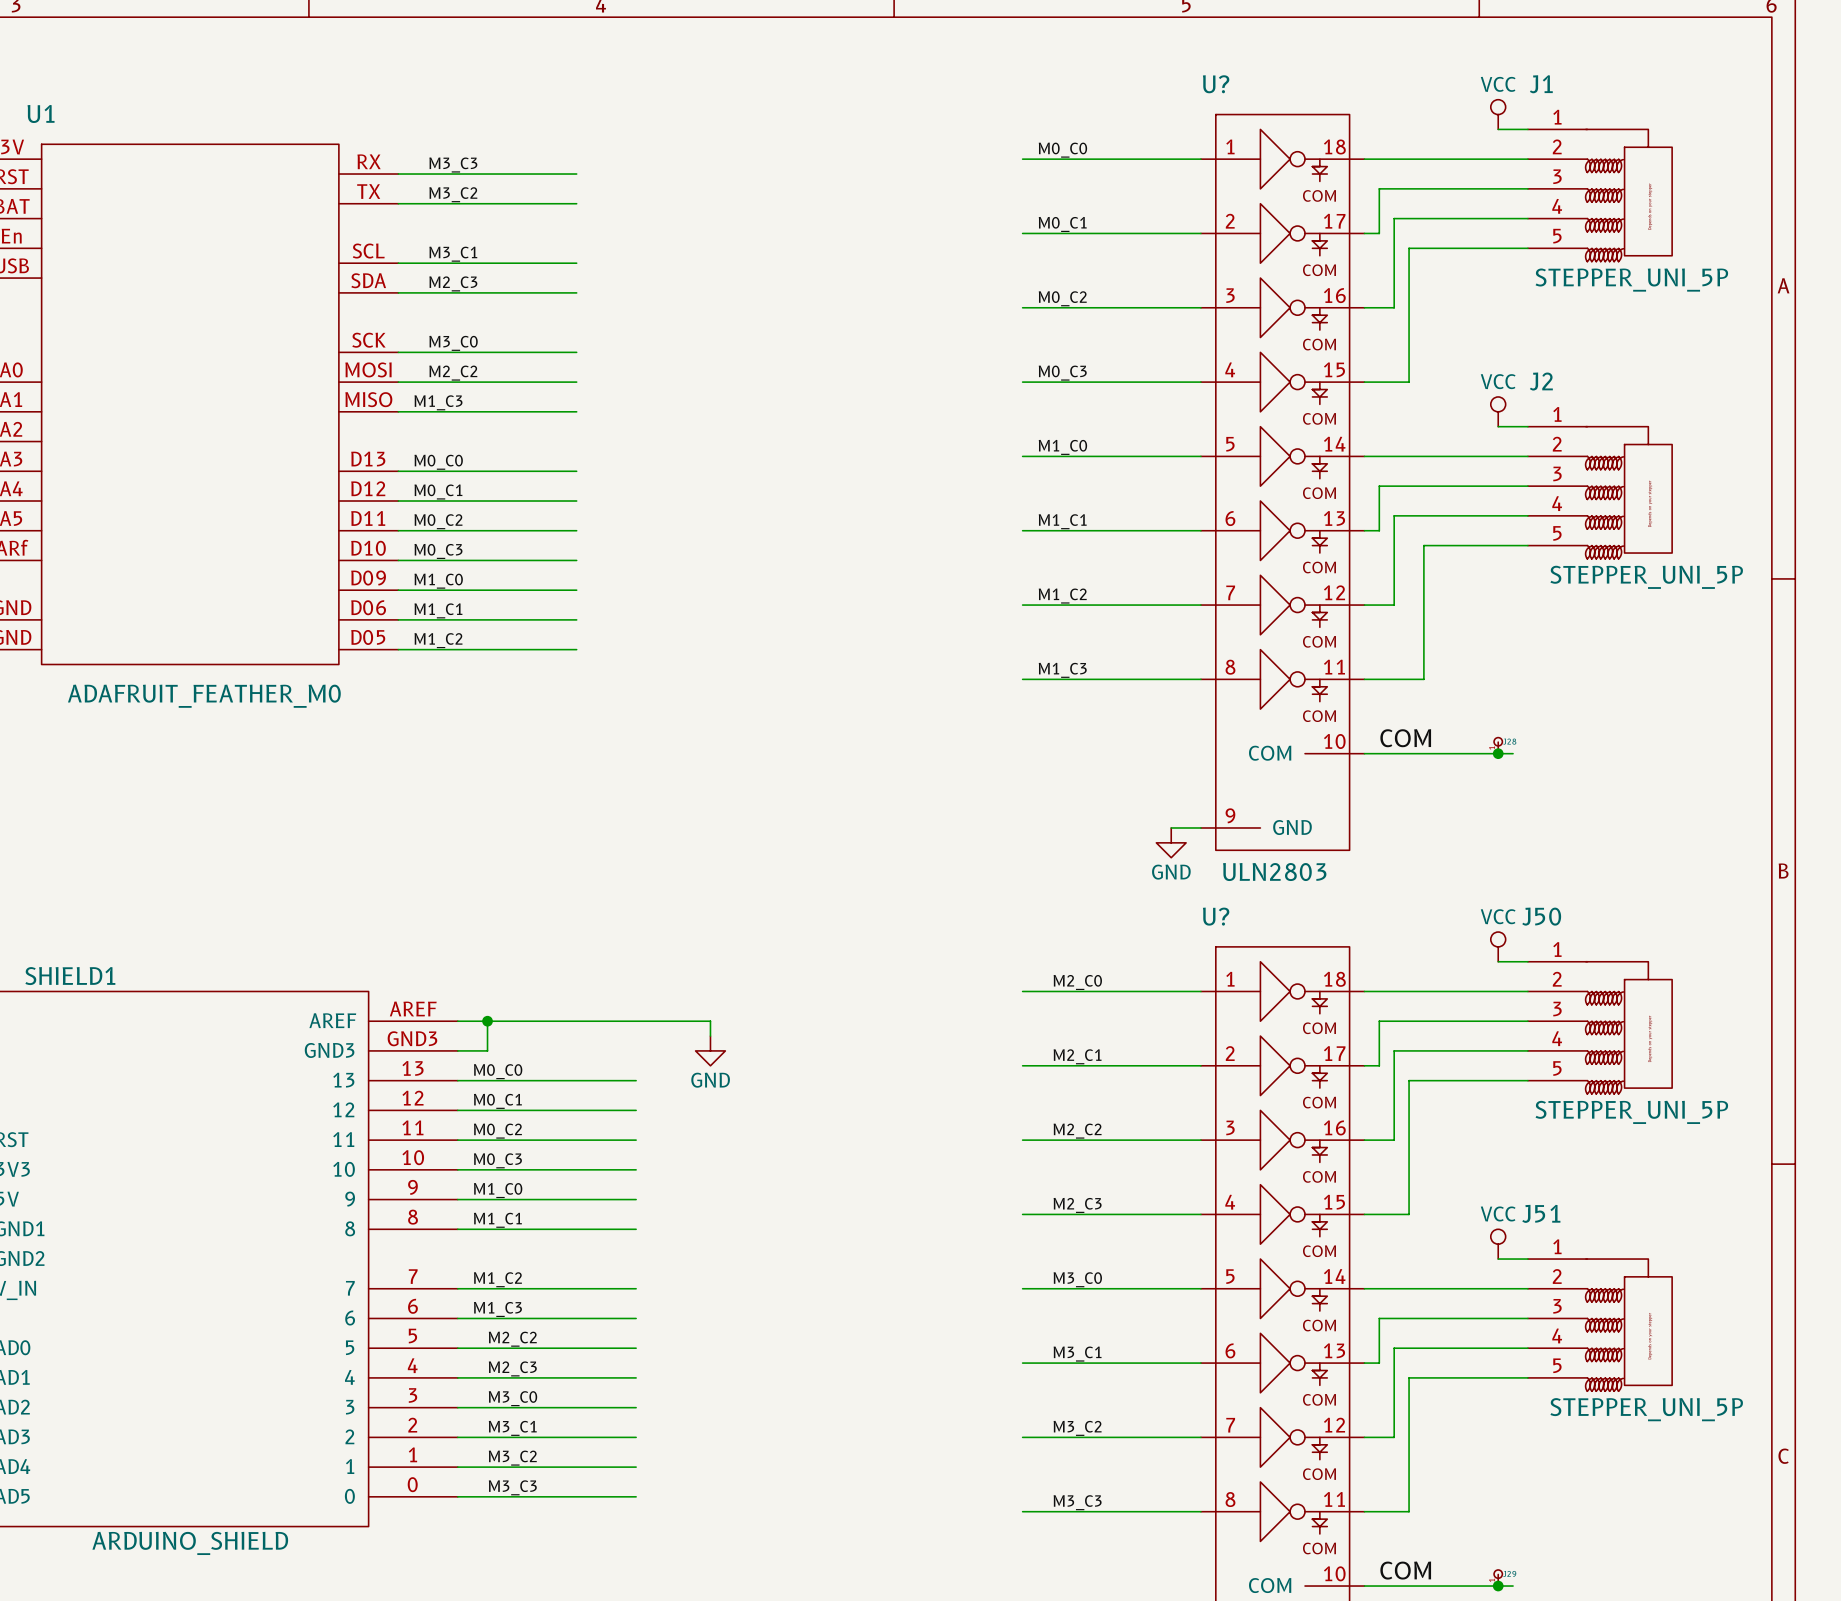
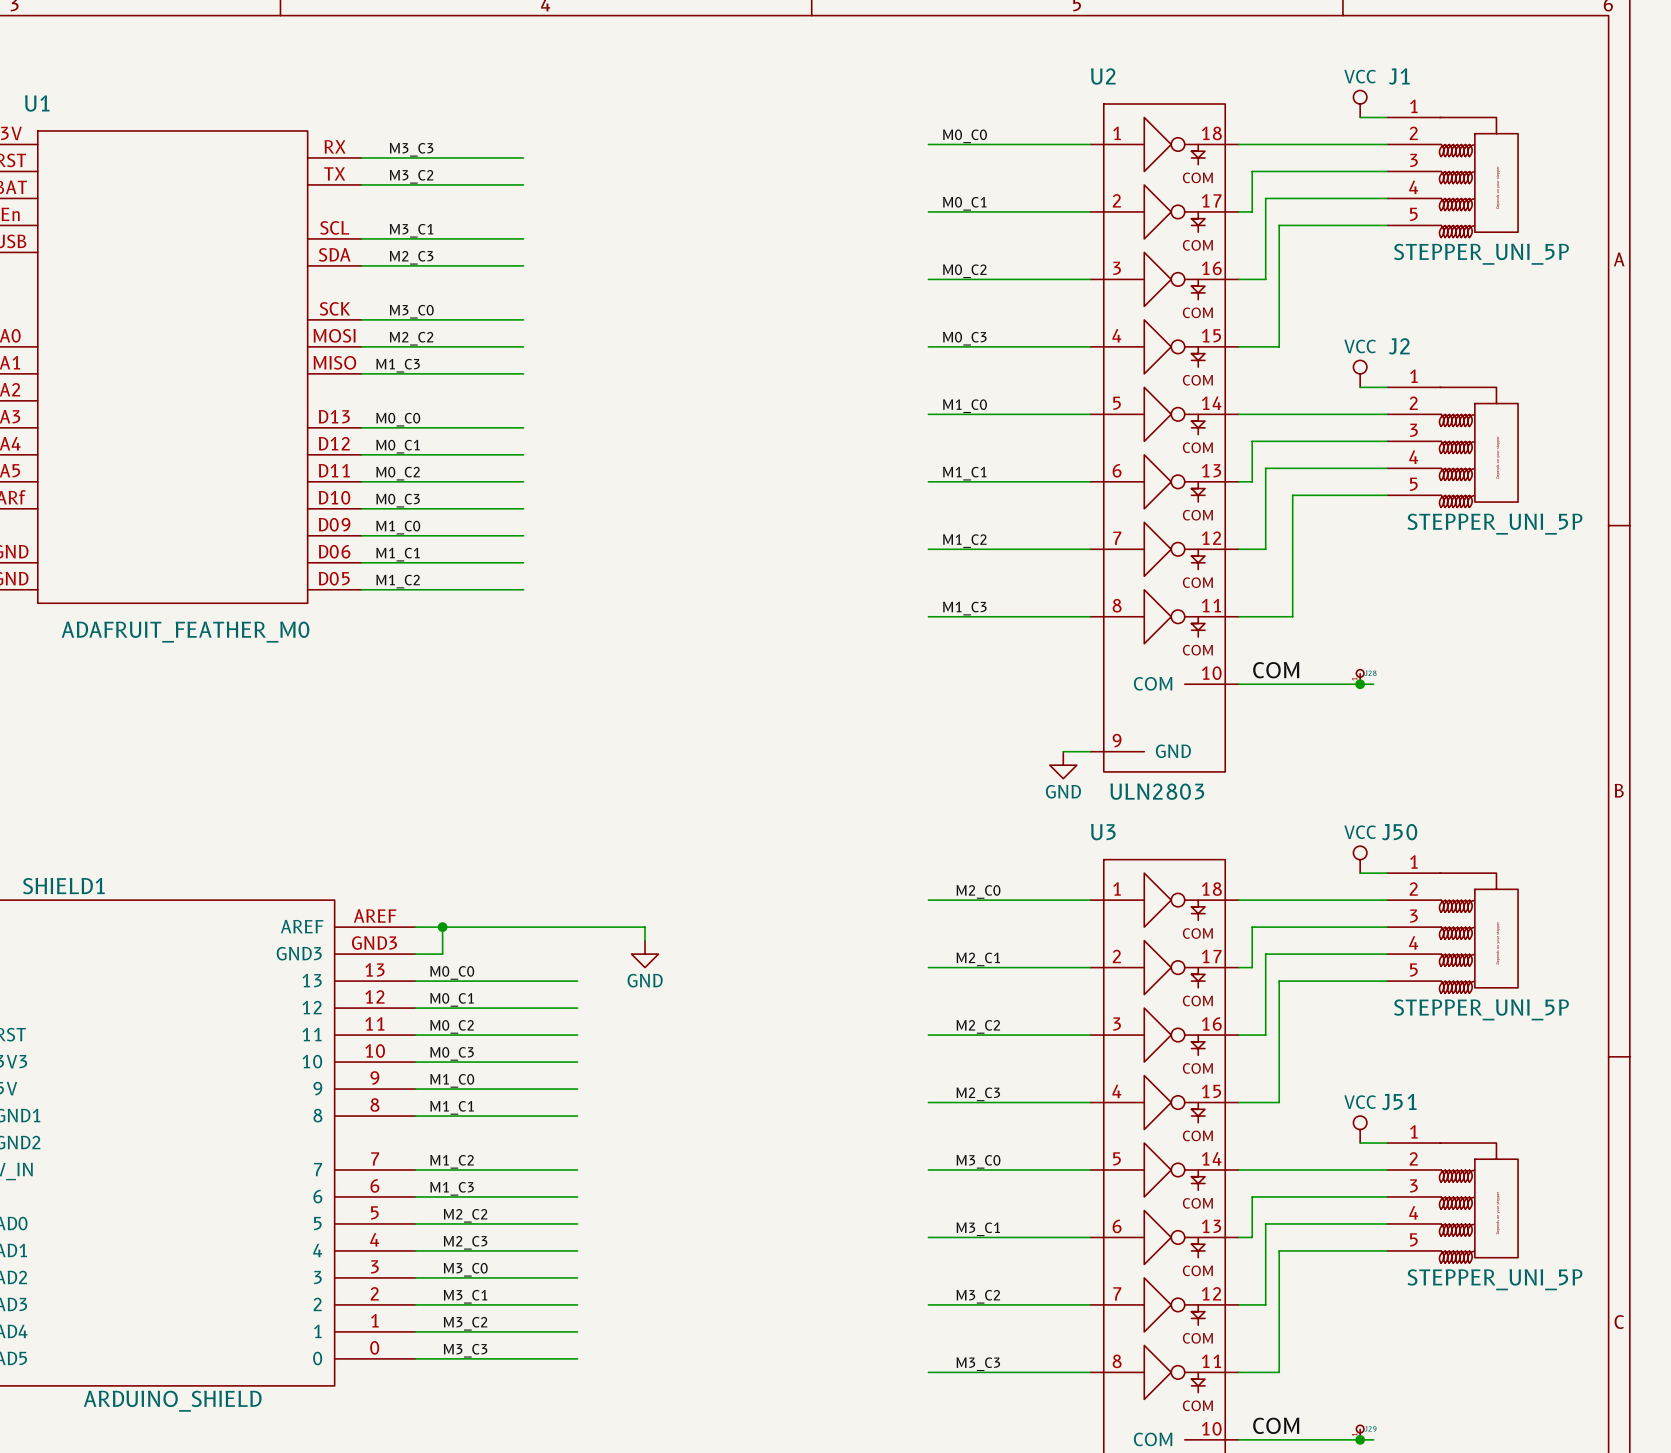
U? name: U? (1216, 84) -> U2 (1103, 76)
U? name: U? (1216, 916) -> U3 (1103, 832)

